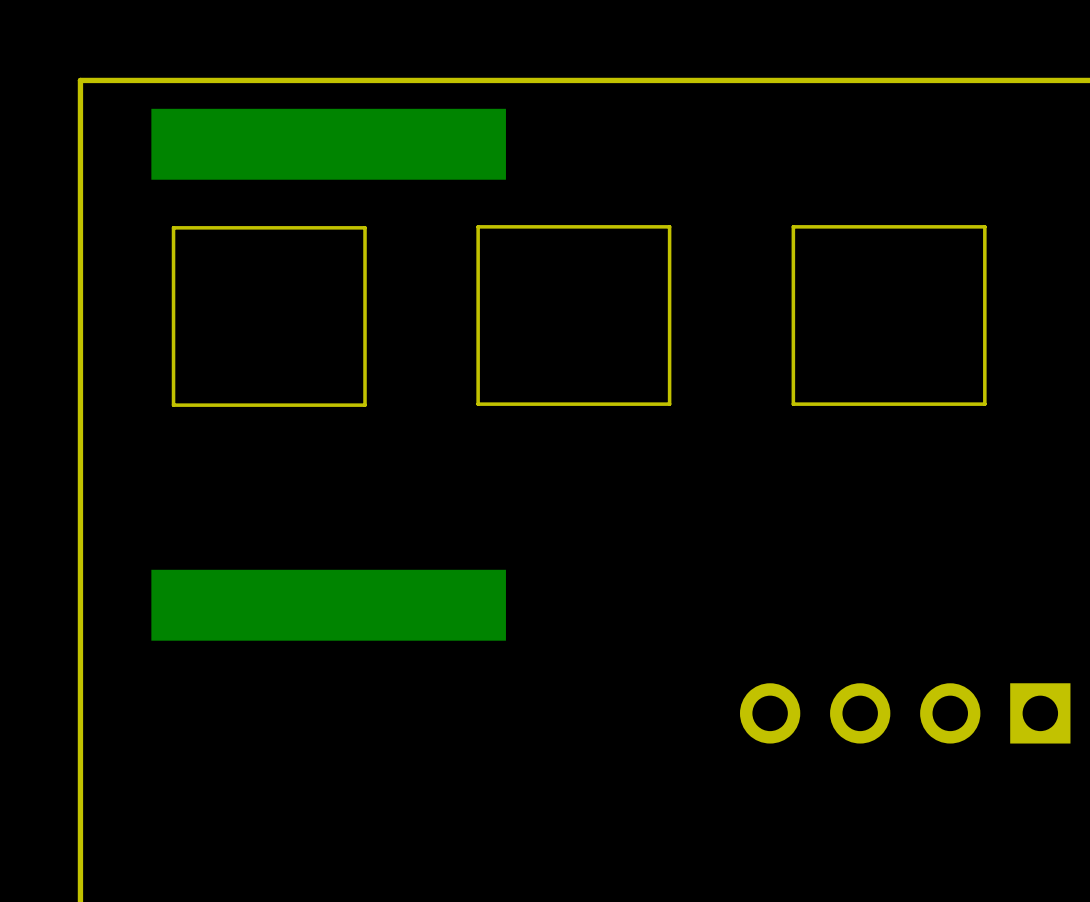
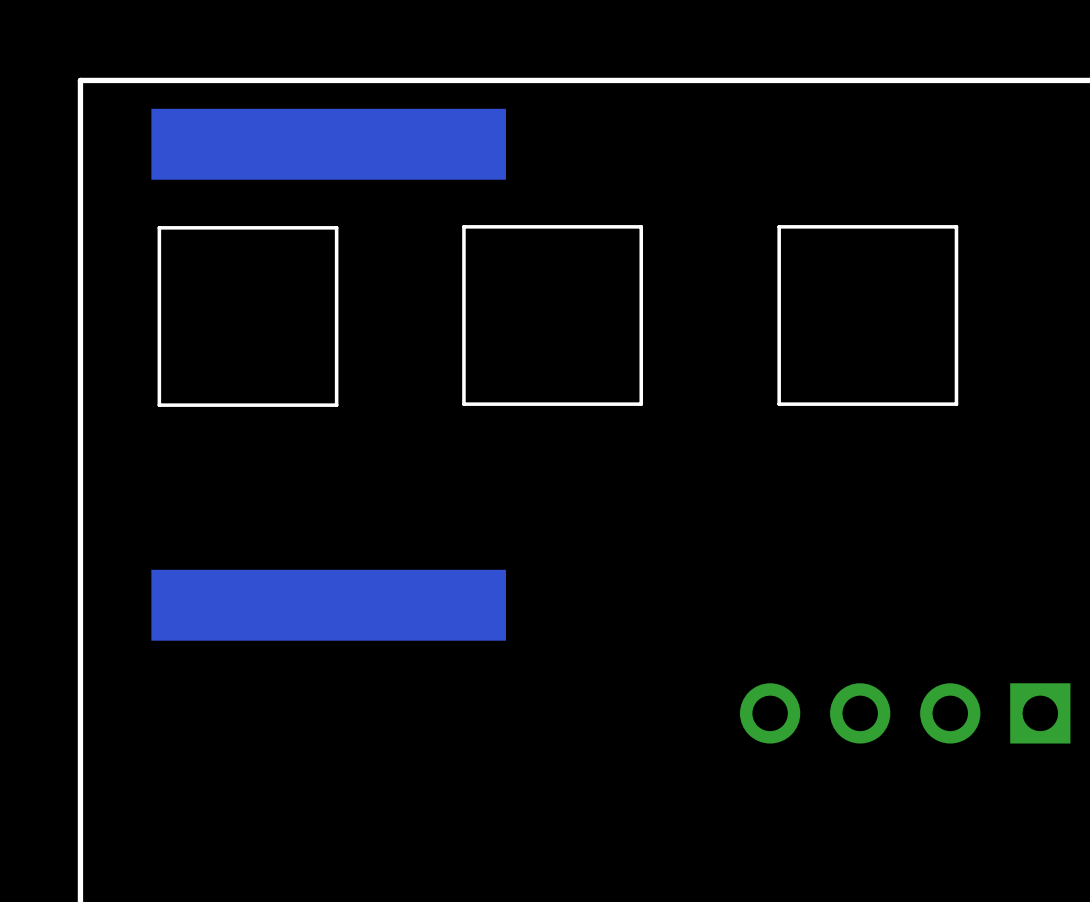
part footprint: [476, 225, 672, 406] -> [462, 225, 644, 406]
part footprint: [791, 225, 987, 406] -> [777, 225, 959, 406]
part footprint: [171, 226, 367, 407] -> [157, 226, 339, 407]

